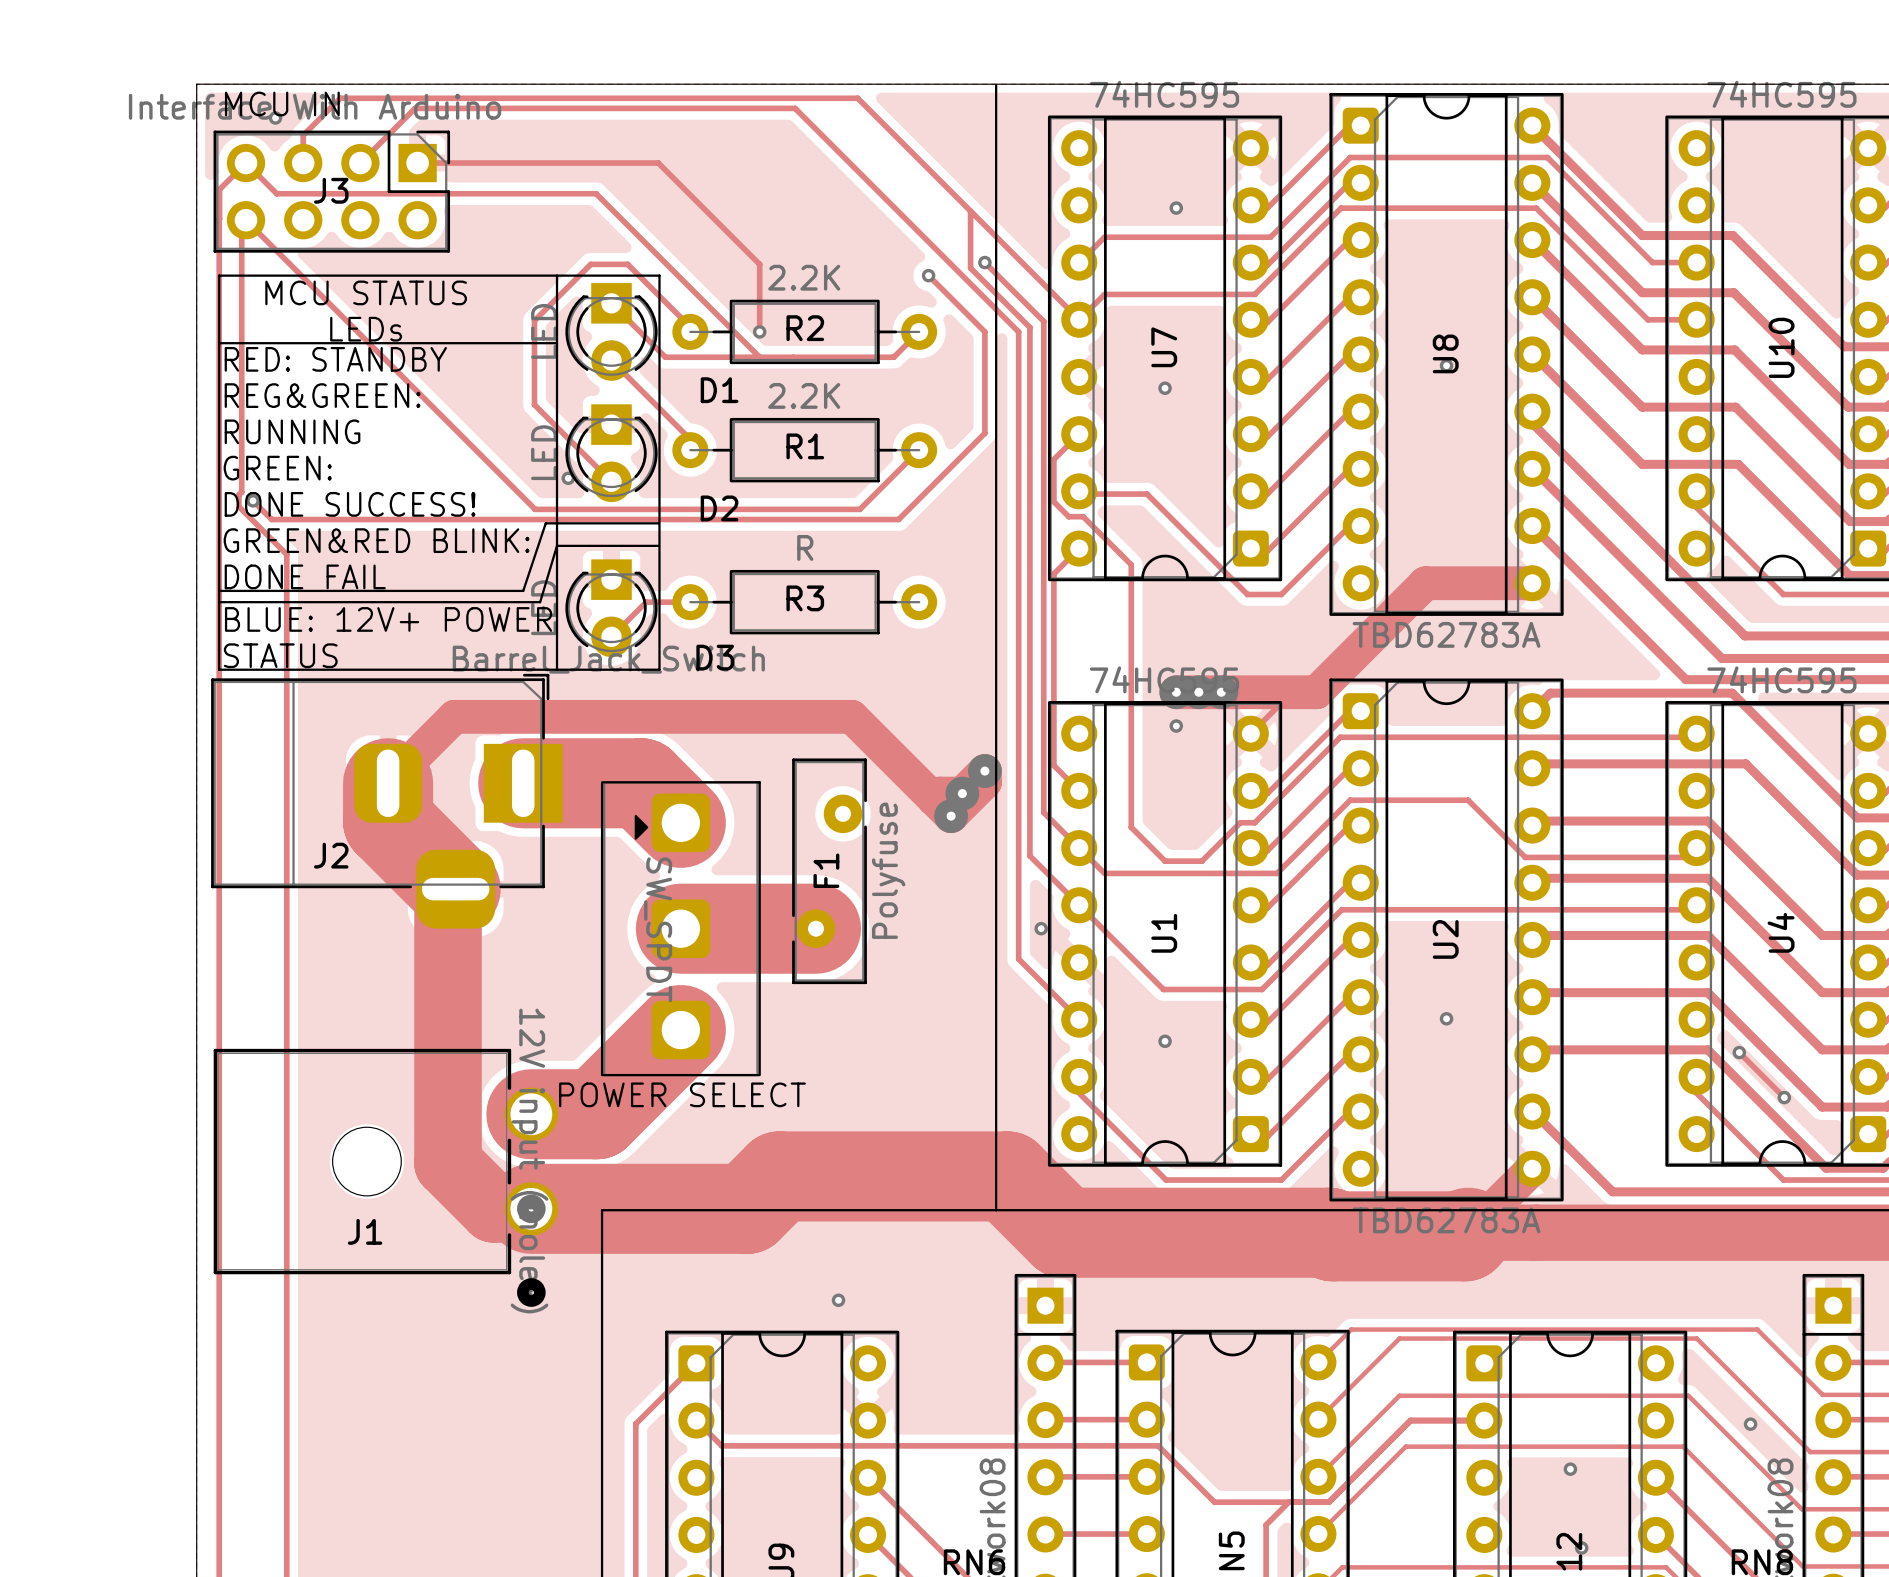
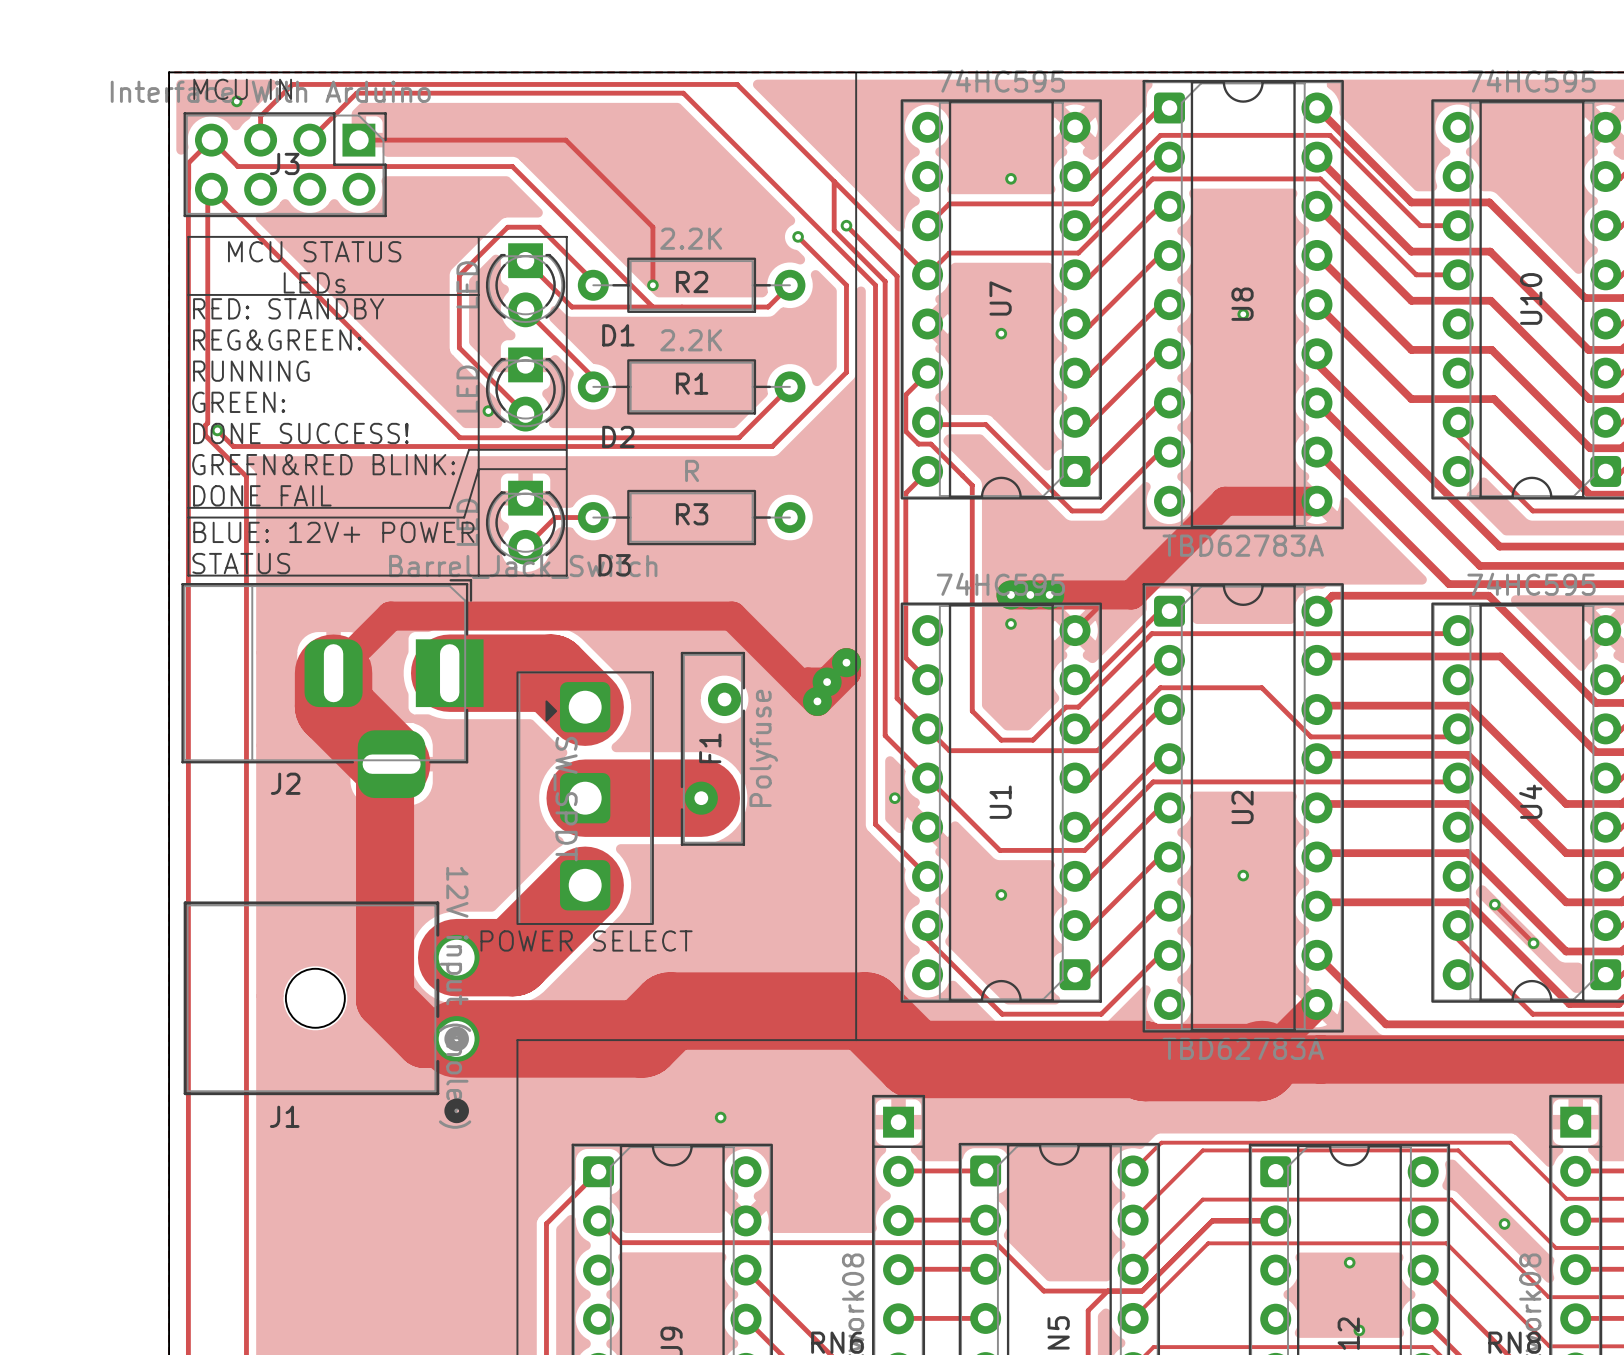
J2 name position: J2 (331, 855) -> J2 (285, 783)
J1 name position: J1 (365, 1231) -> J1 (284, 1116)

